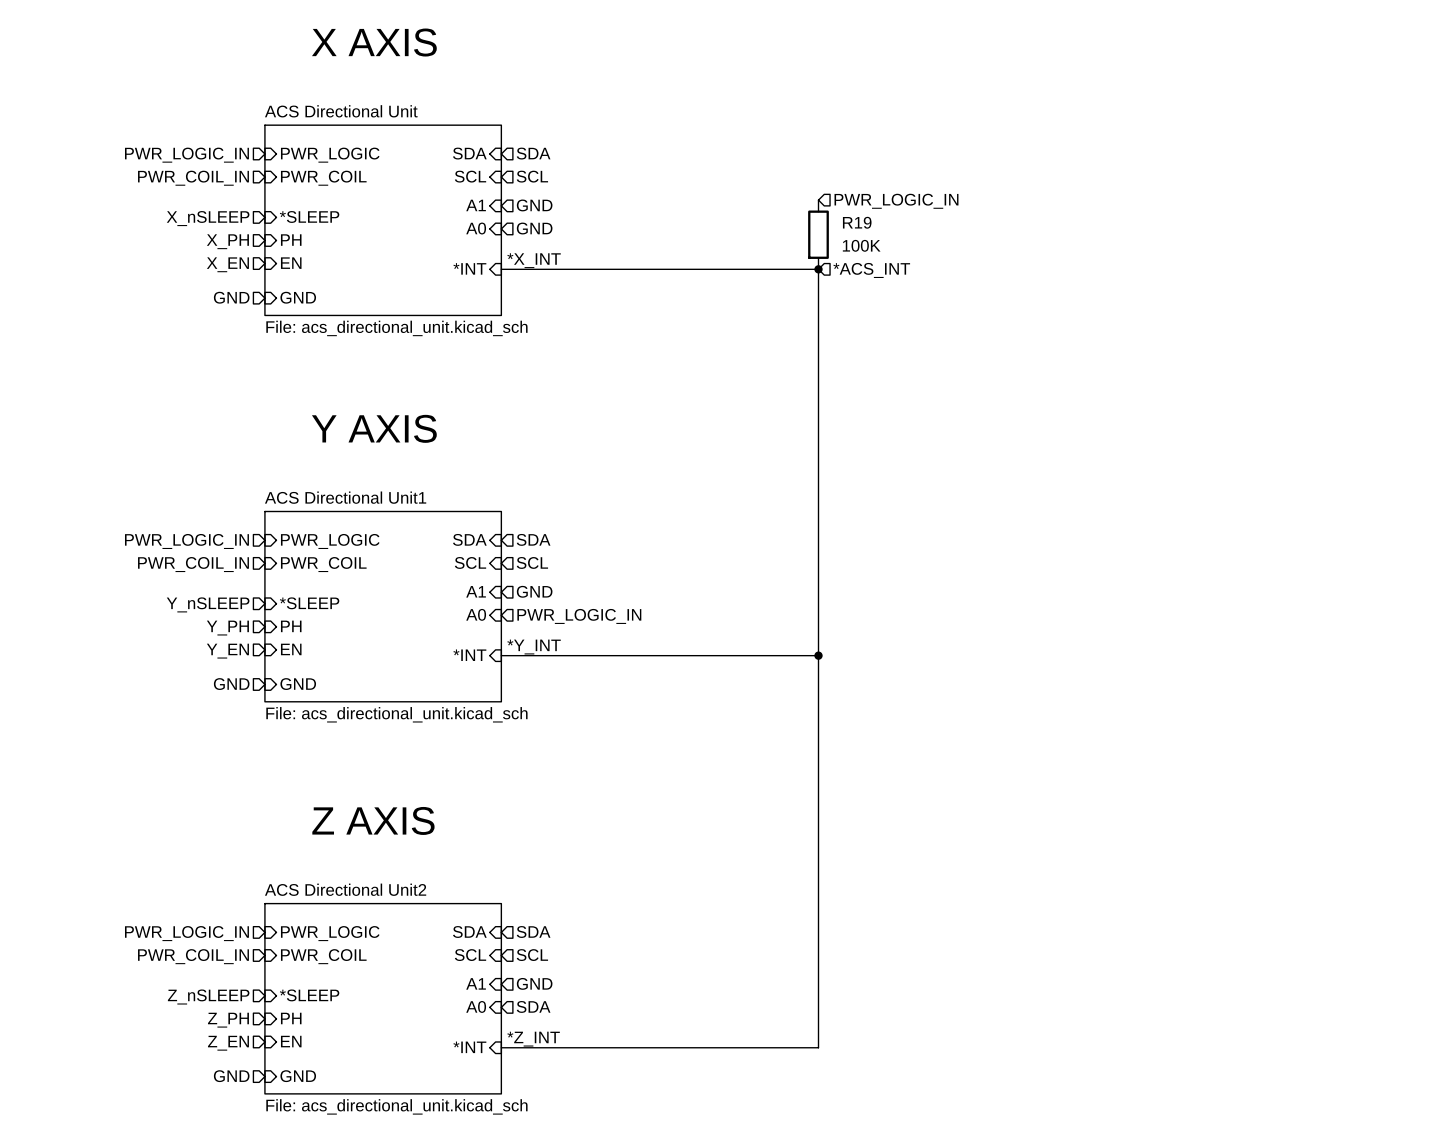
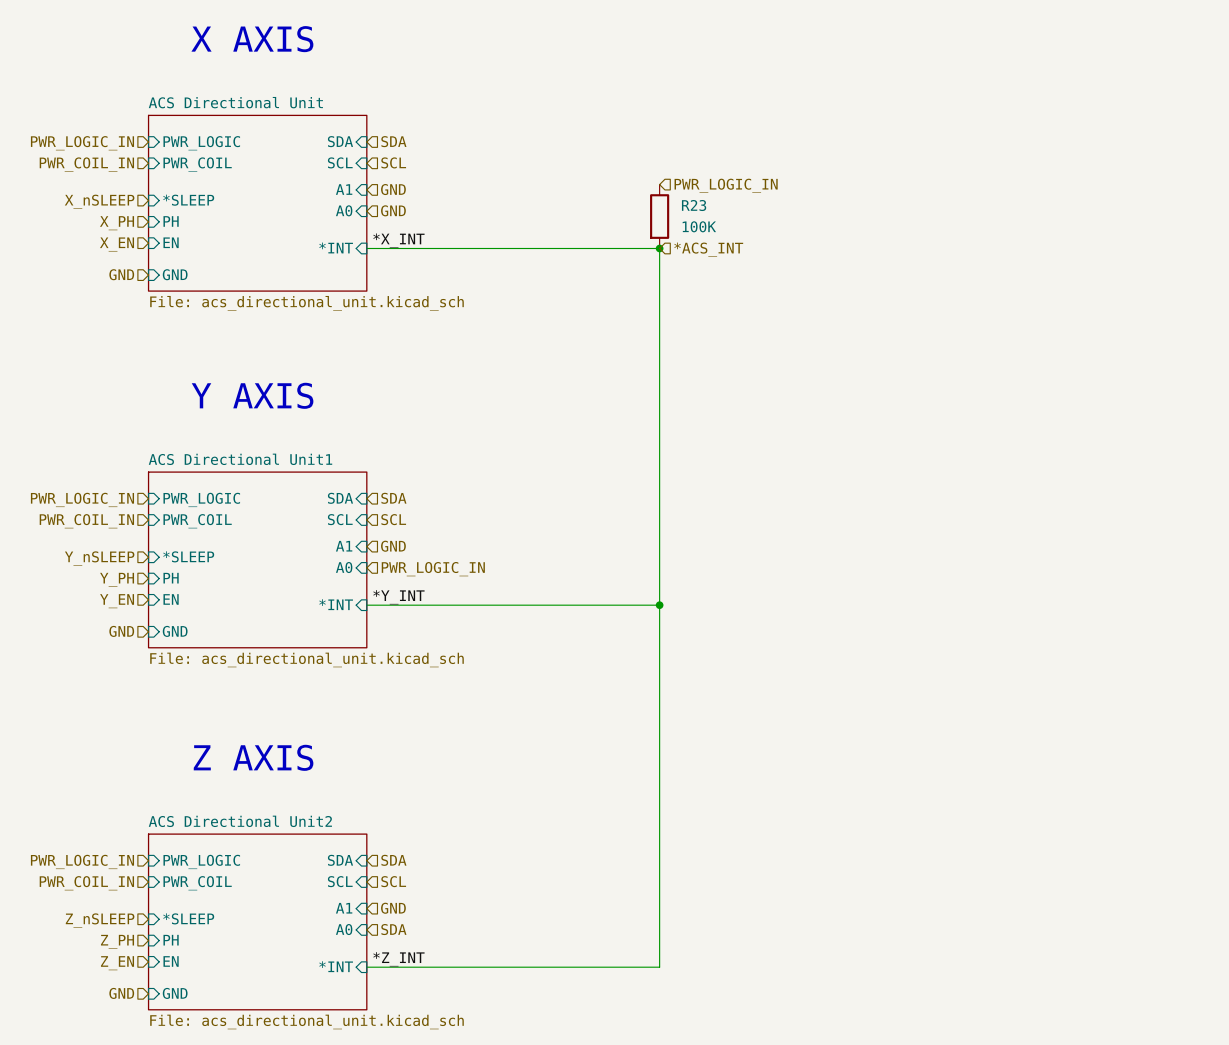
R19 name: R19 (857, 222) -> R23 (694, 205)

